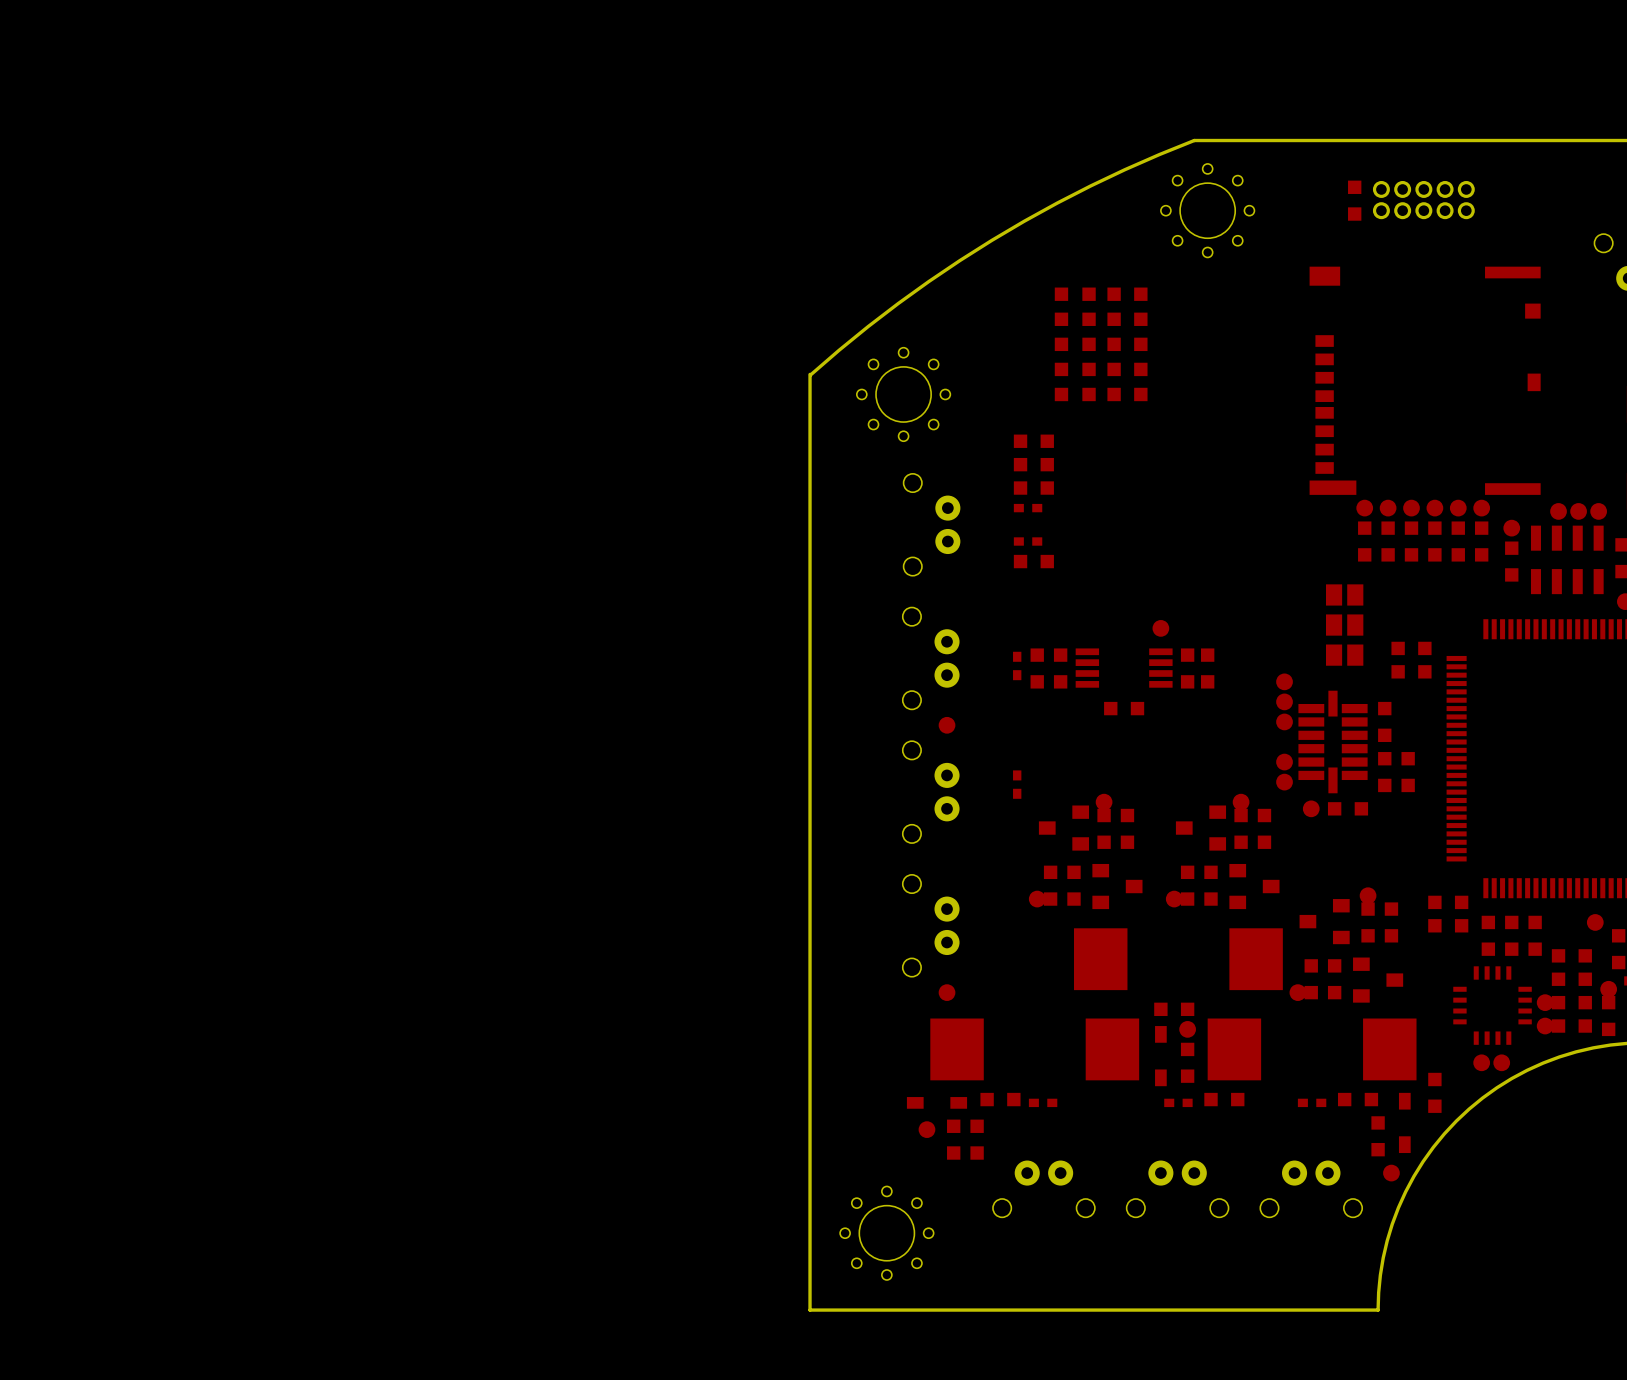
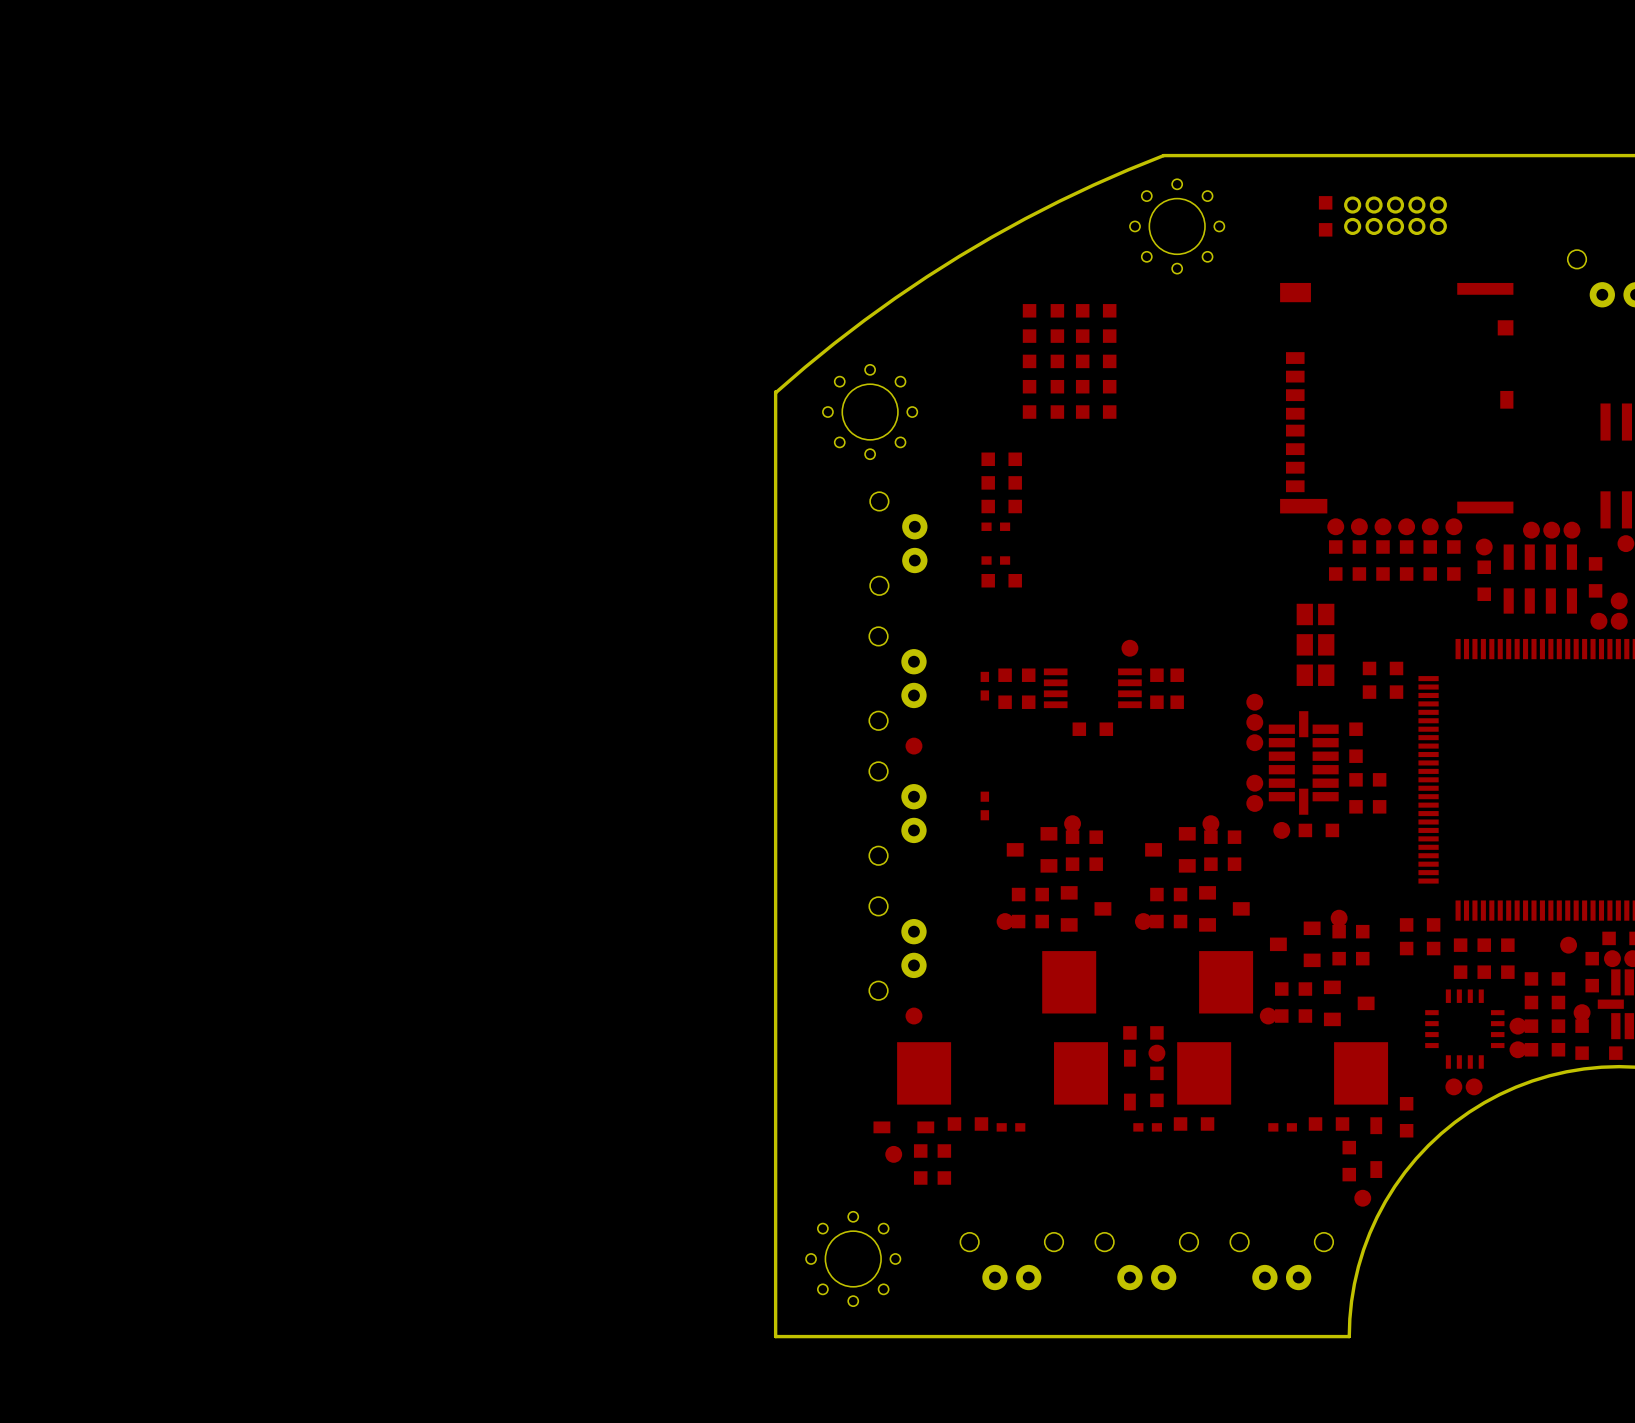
part rotation: 0° (1043, 1188) -> 180° (1011, 1261)
part rotation: 0° (1177, 1188) -> 180° (1146, 1261)
part rotation: 0° (1311, 1188) -> 180° (1281, 1261)

